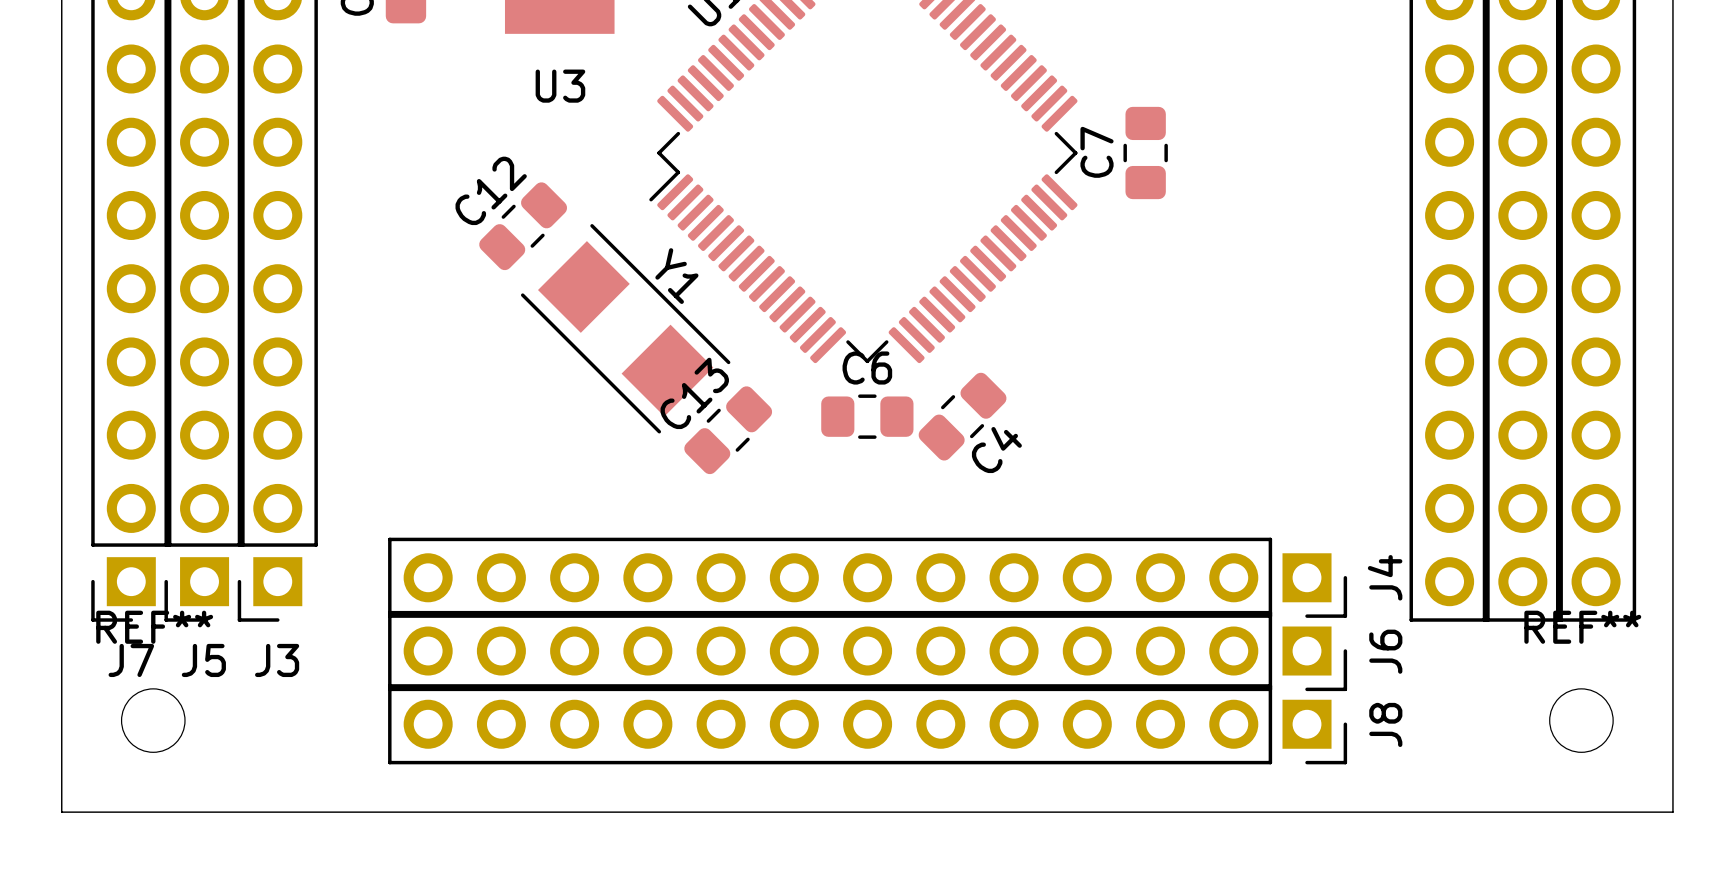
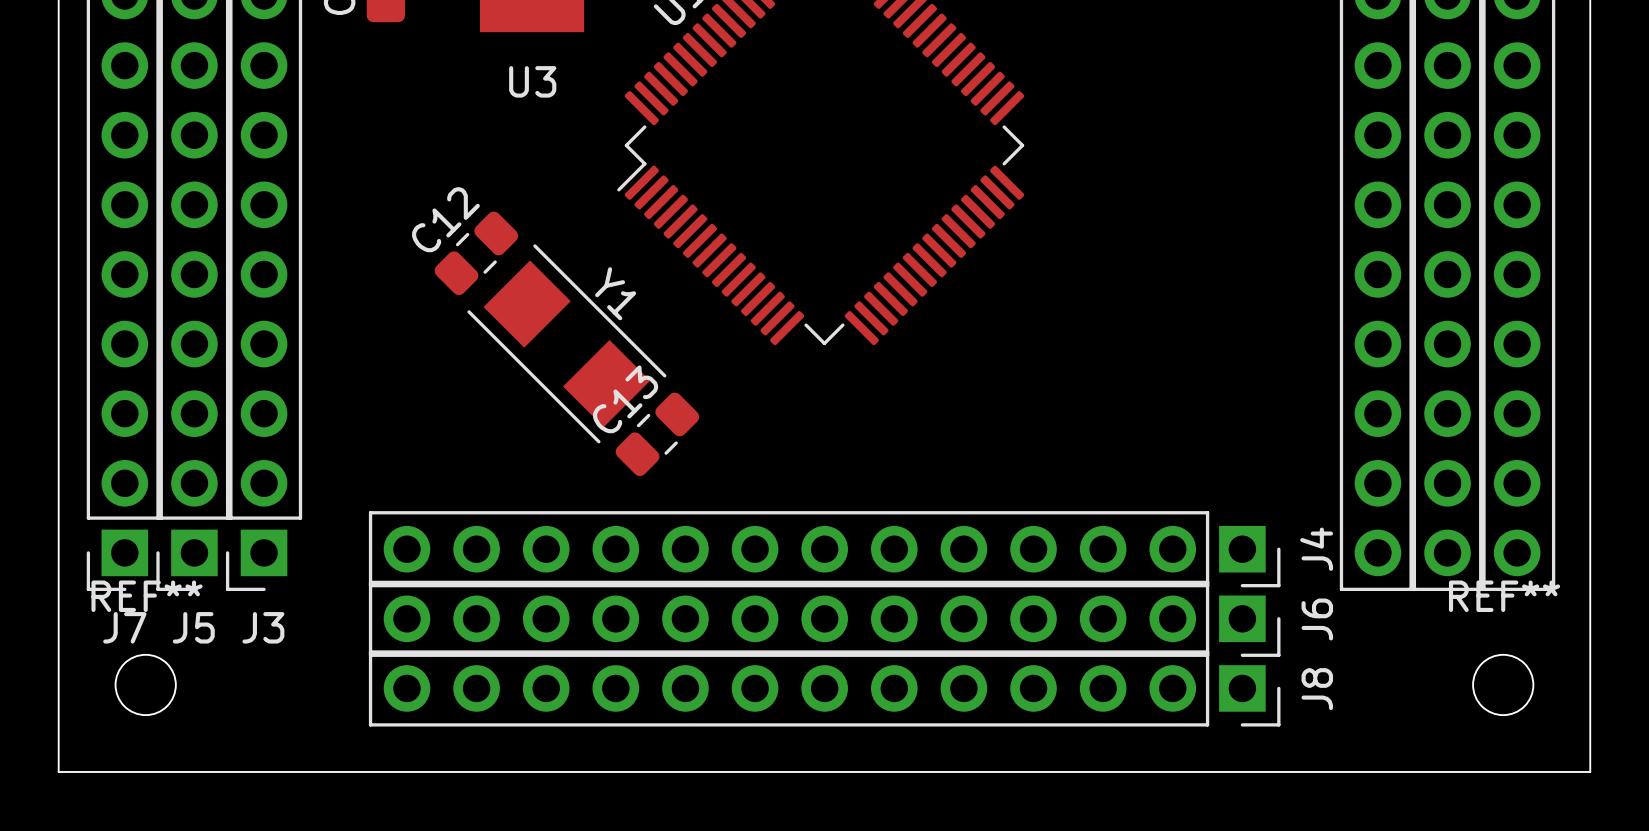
C7: (1145, 153) -> none
C12 position: (523, 226) -> (476, 253)
Y1 position: (625, 328) -> (566, 343)
C6: (867, 416) -> none
C4: (962, 416) -> none
C13 position: (728, 430) -> (657, 434)

